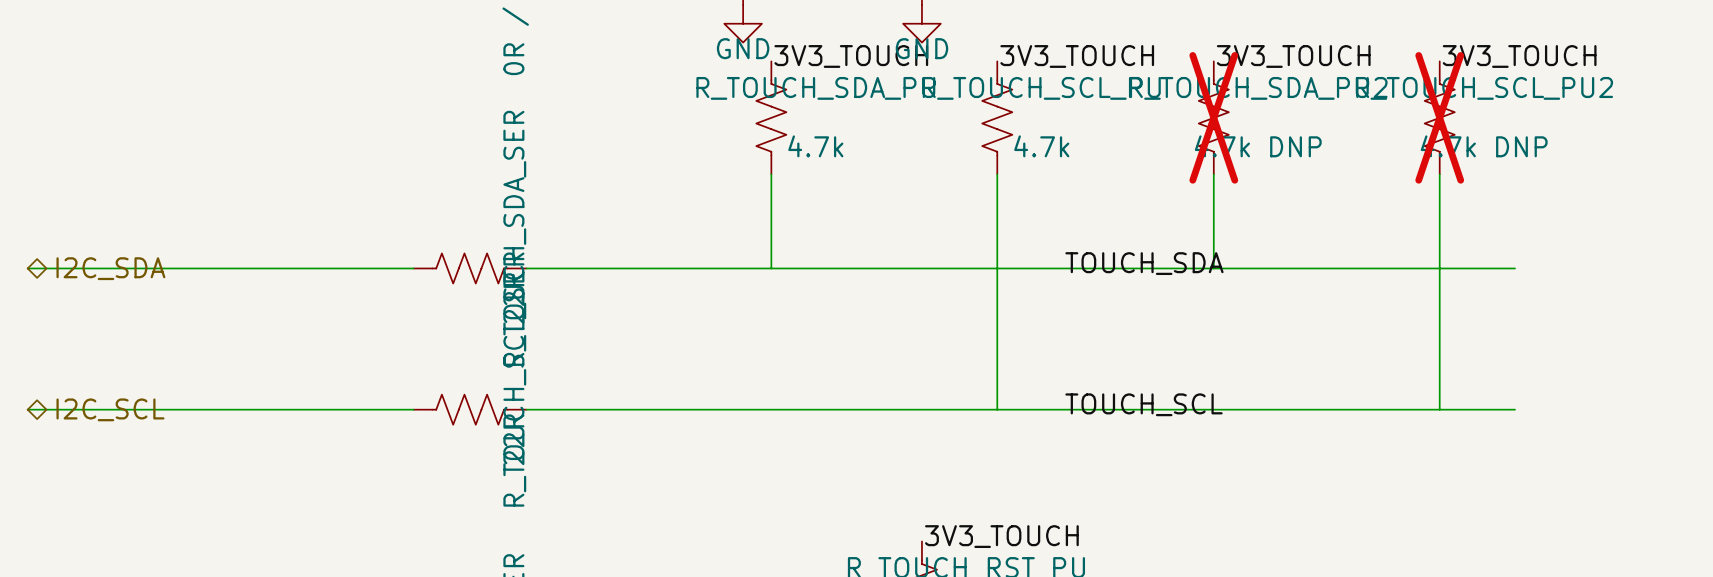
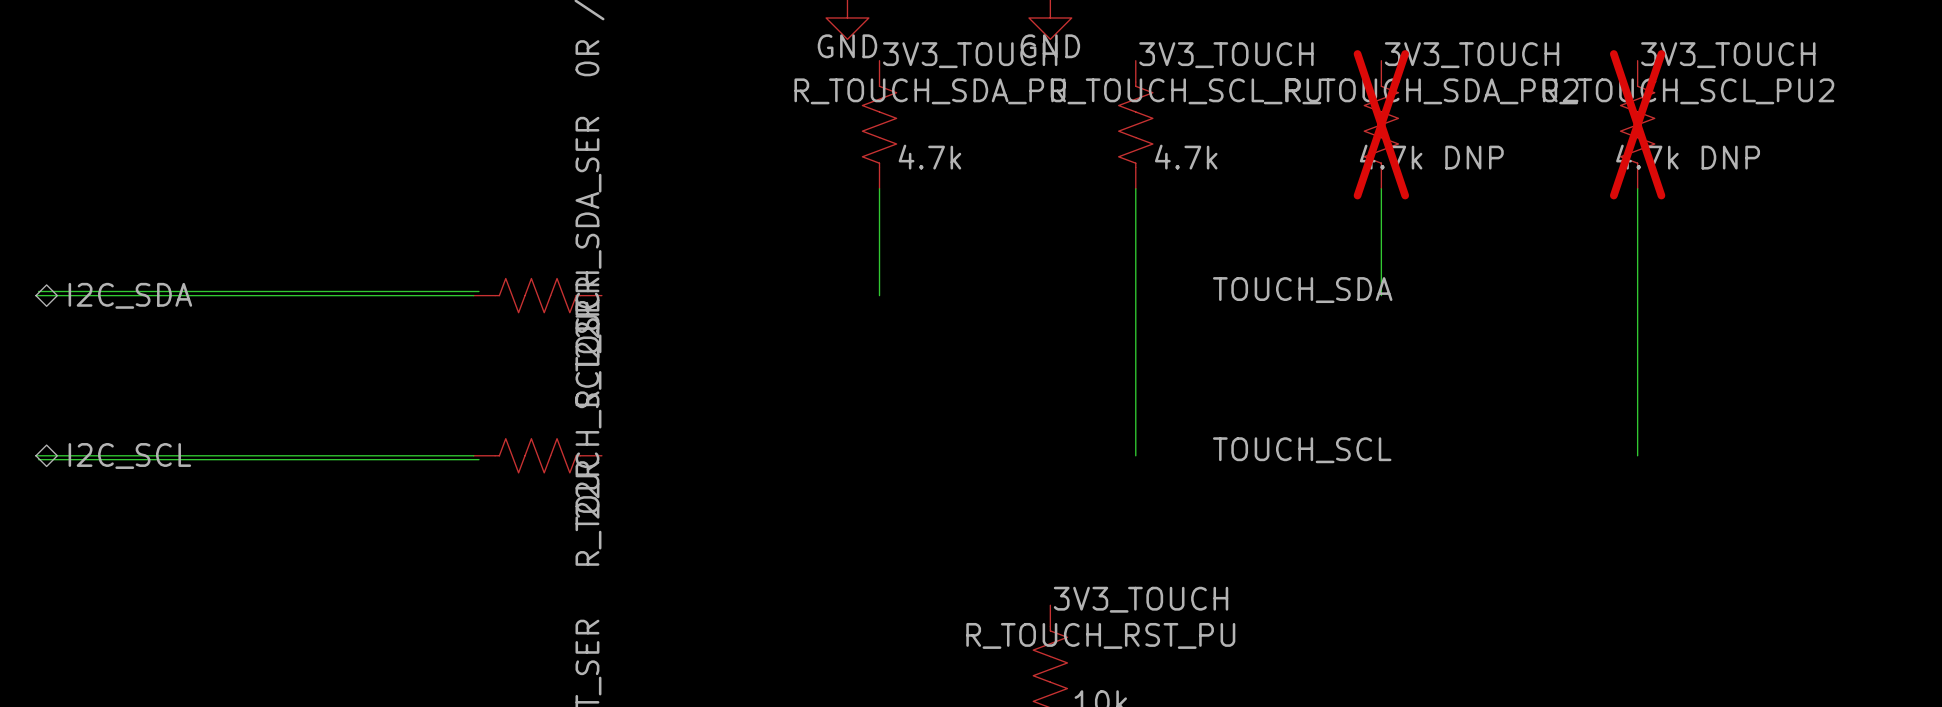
wire: none -> (38, 291) (478, 291)
wire: (526, 268) (1515, 268) -> none
wire: (526, 409) (1515, 409) -> none
wire: none -> (38, 459) (478, 459)

